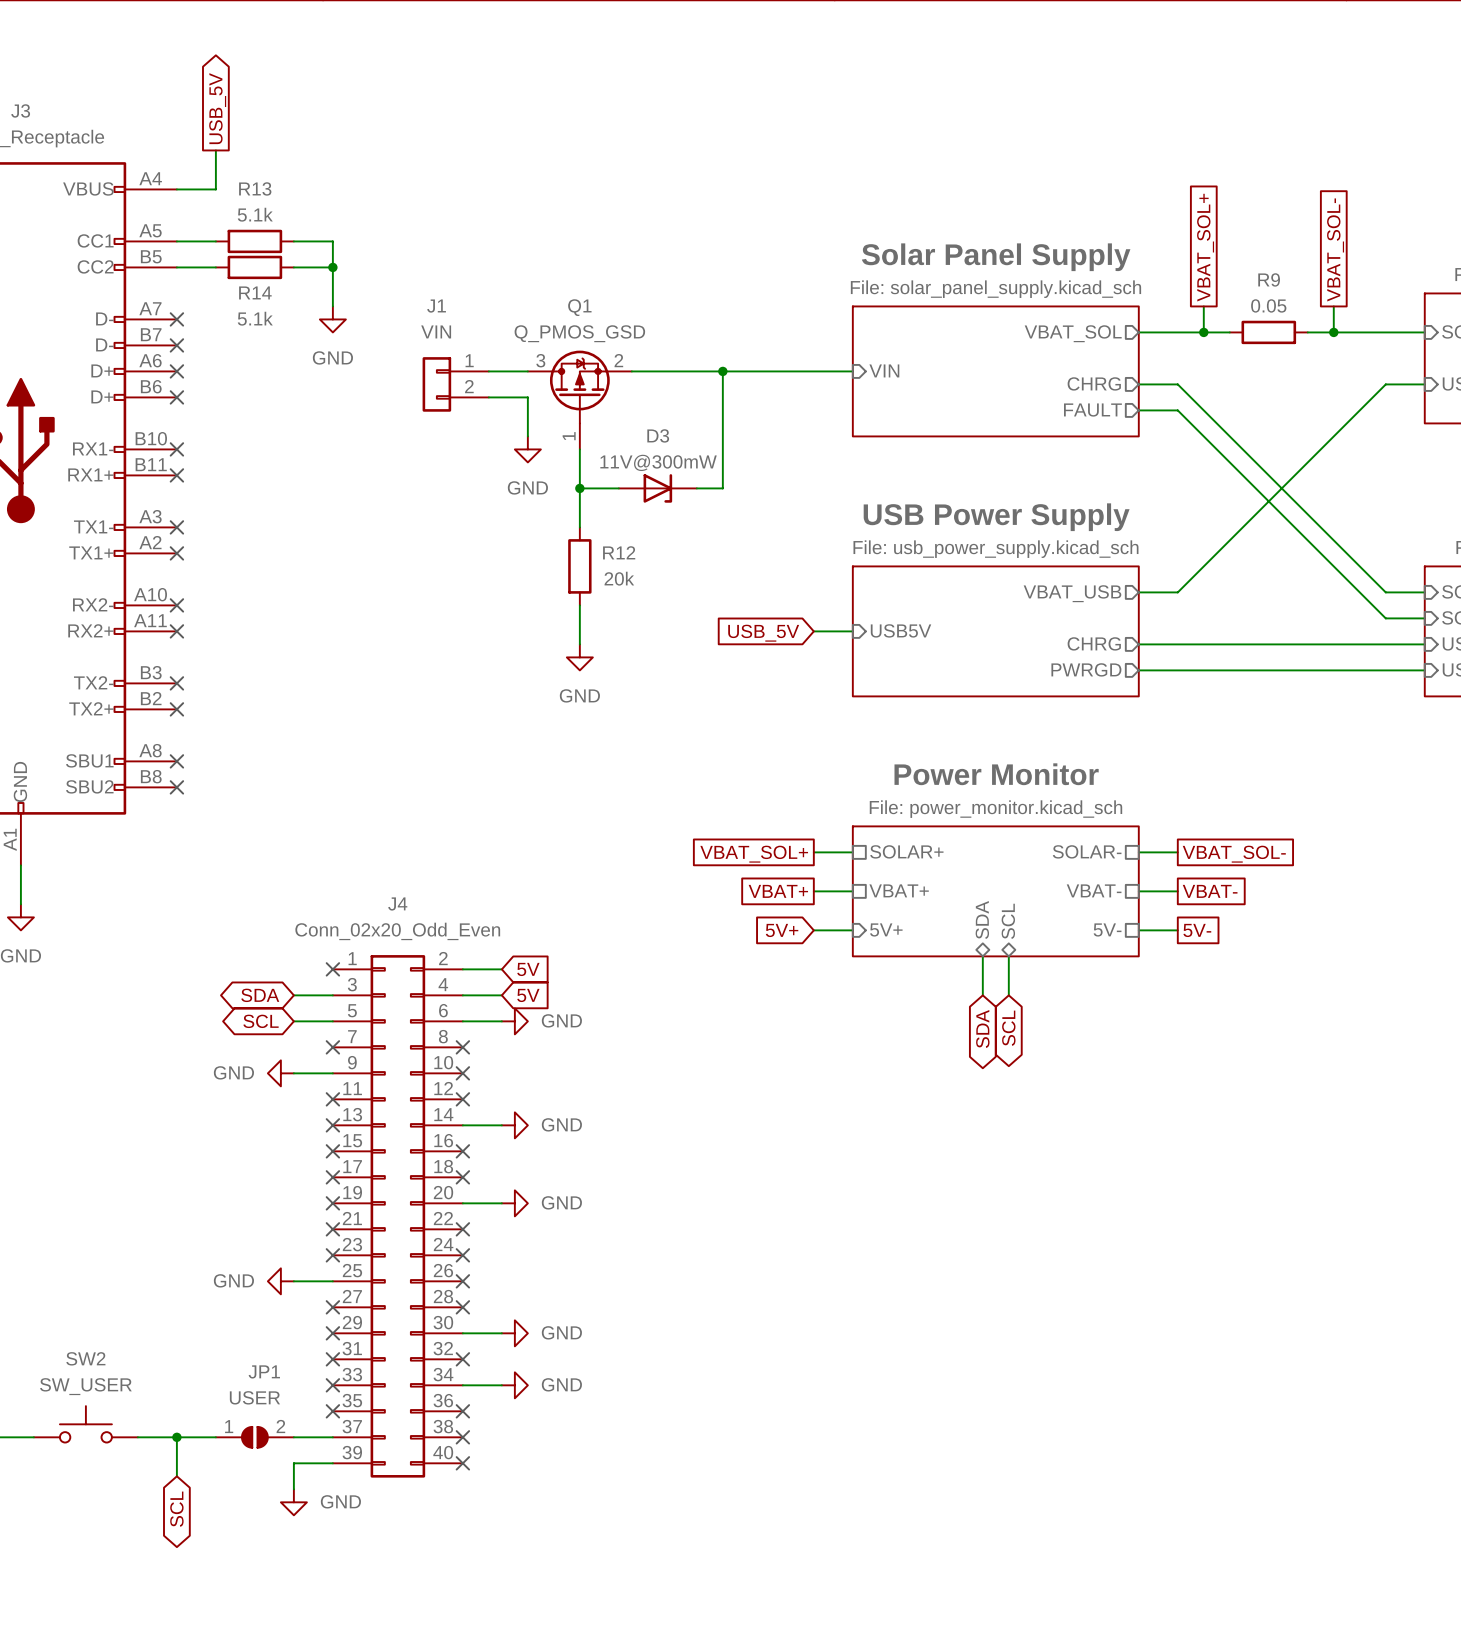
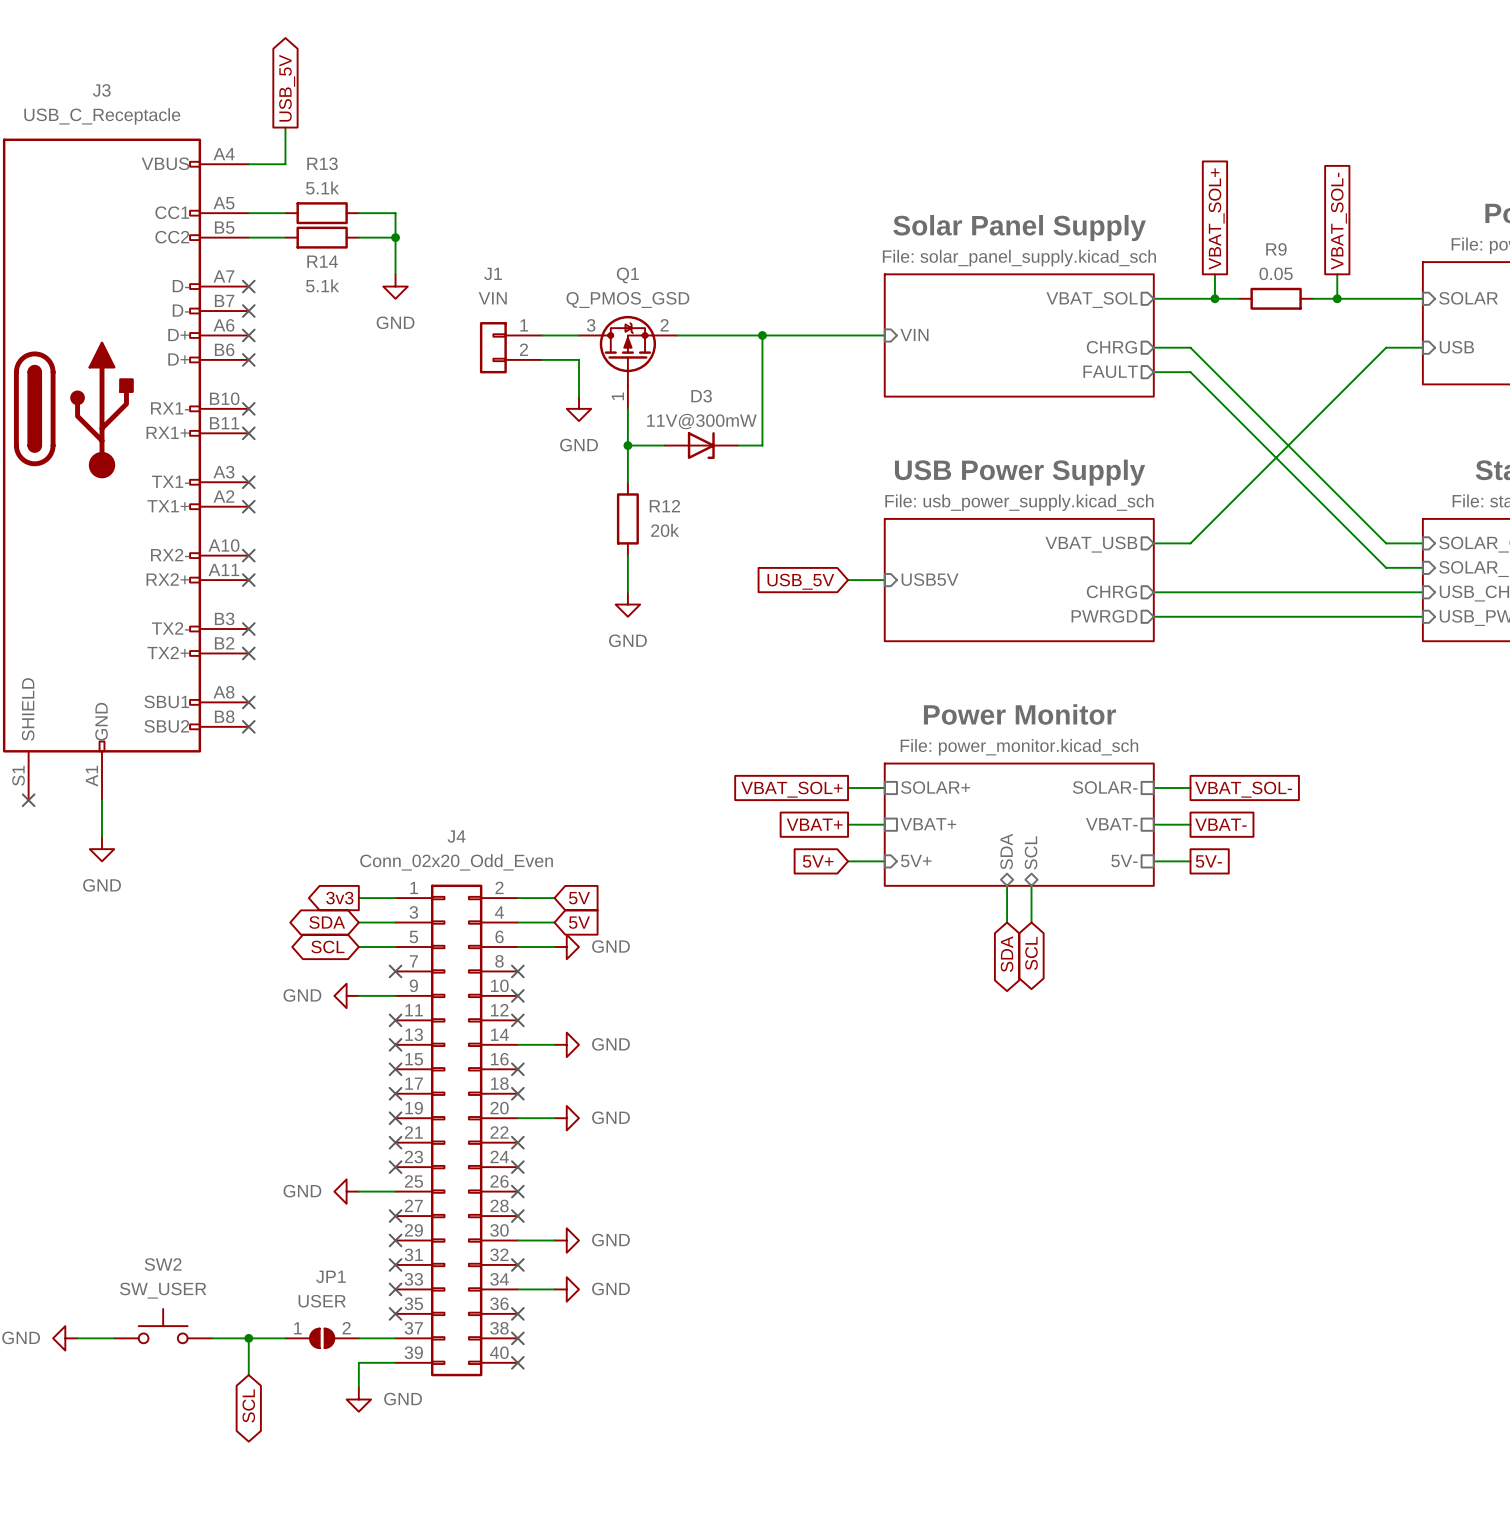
global label: none -> 3v3 (339, 898)
wire: none -> (358, 898) (395, 898)
no-connect mark: (332, 969) -> none

